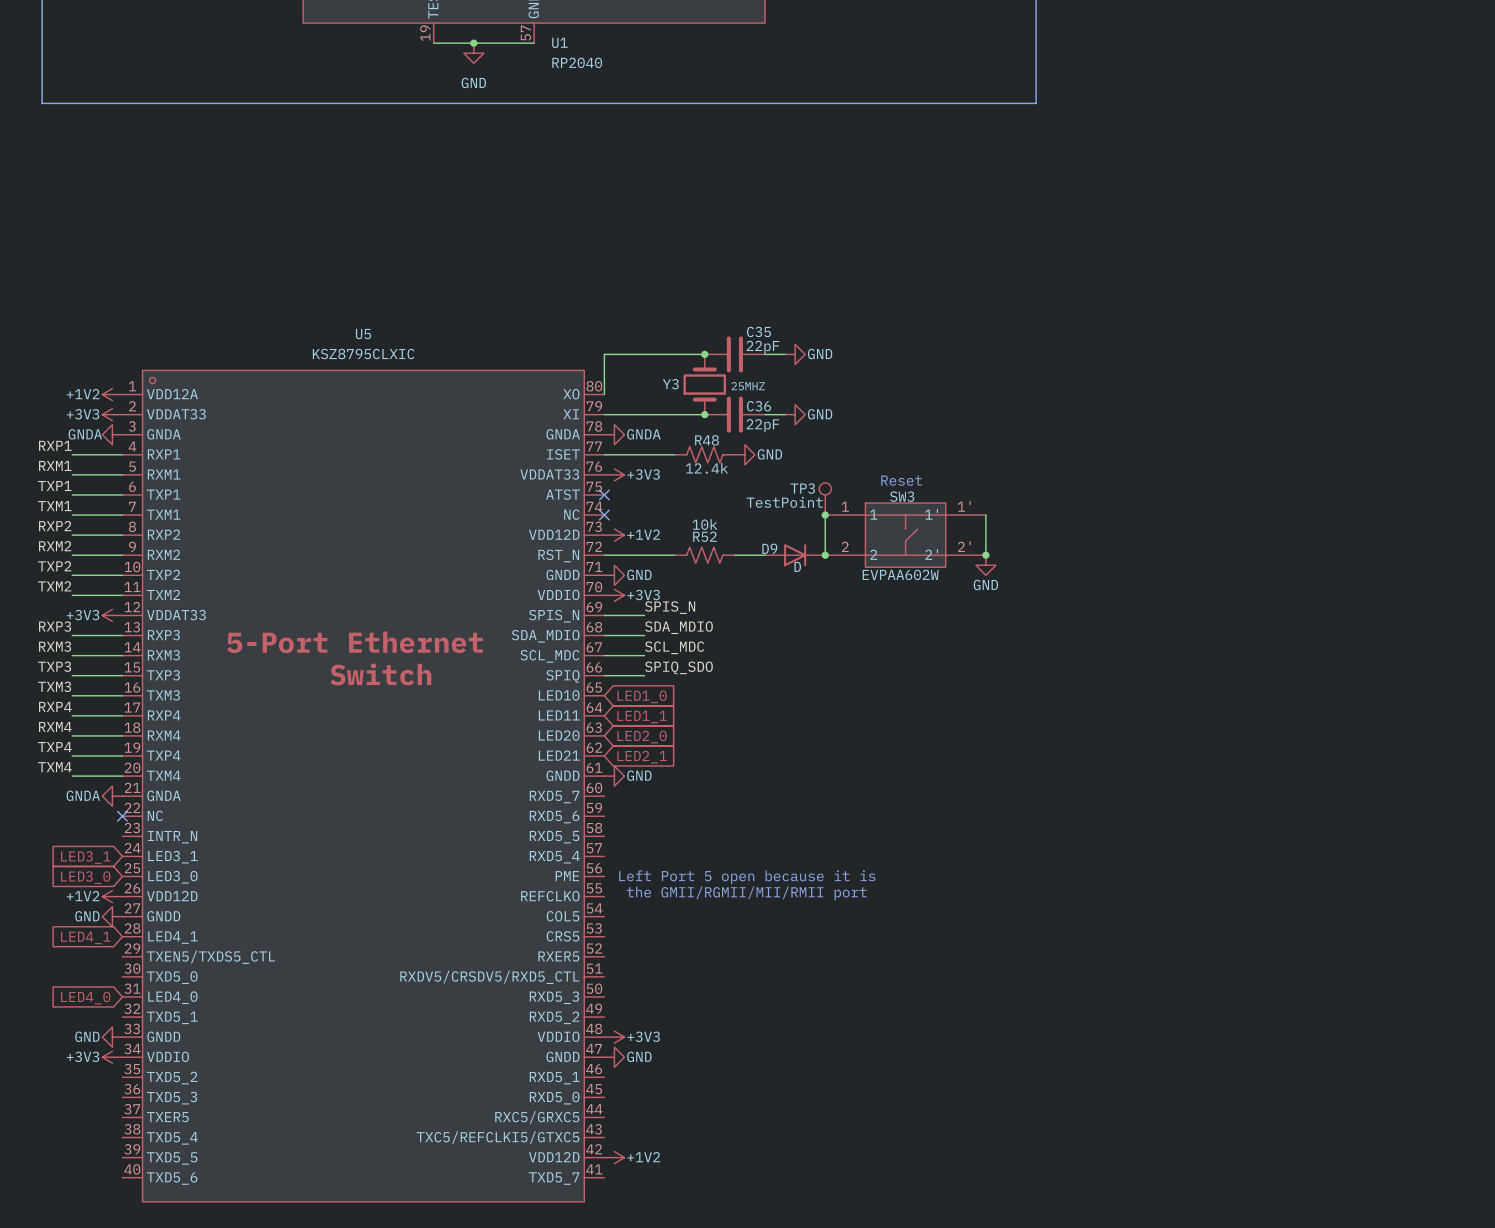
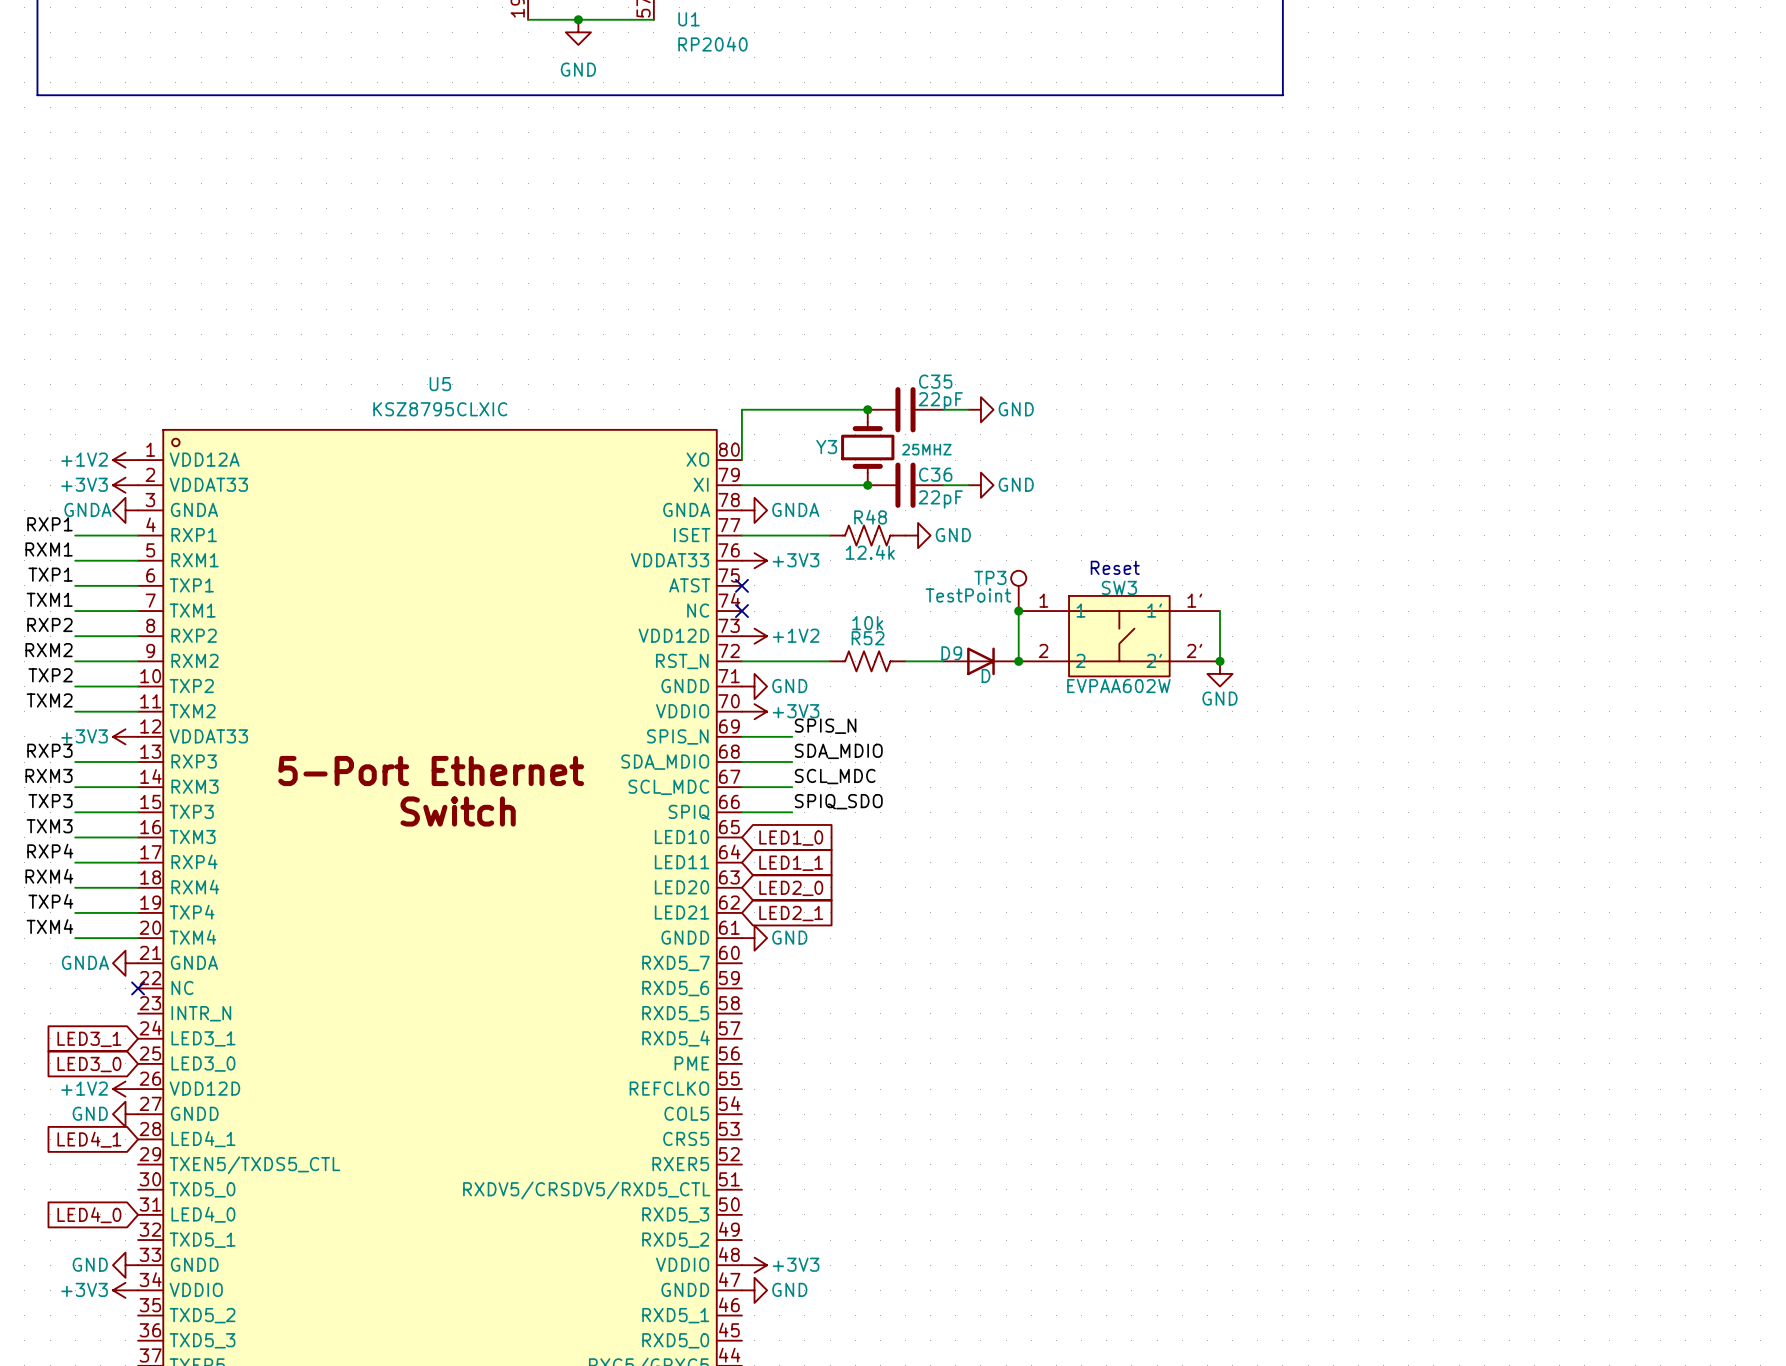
text: Left Port 5 open because it is (747, 877) -> none
text: the GMII/RGMII/MII/RMII port (746, 893) -> none

